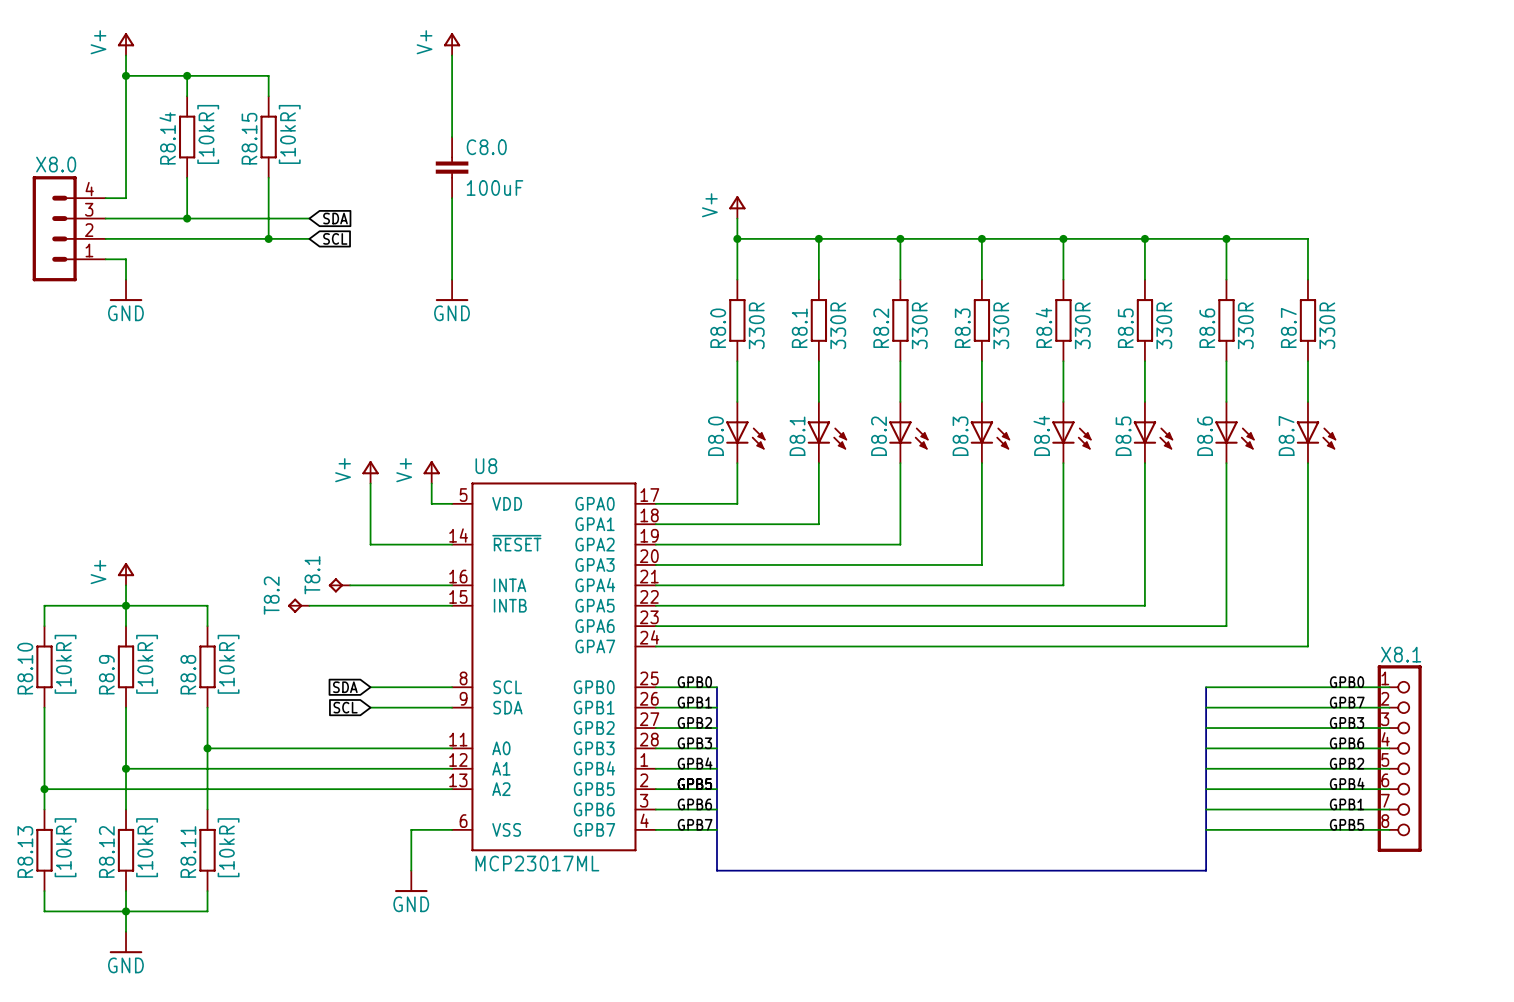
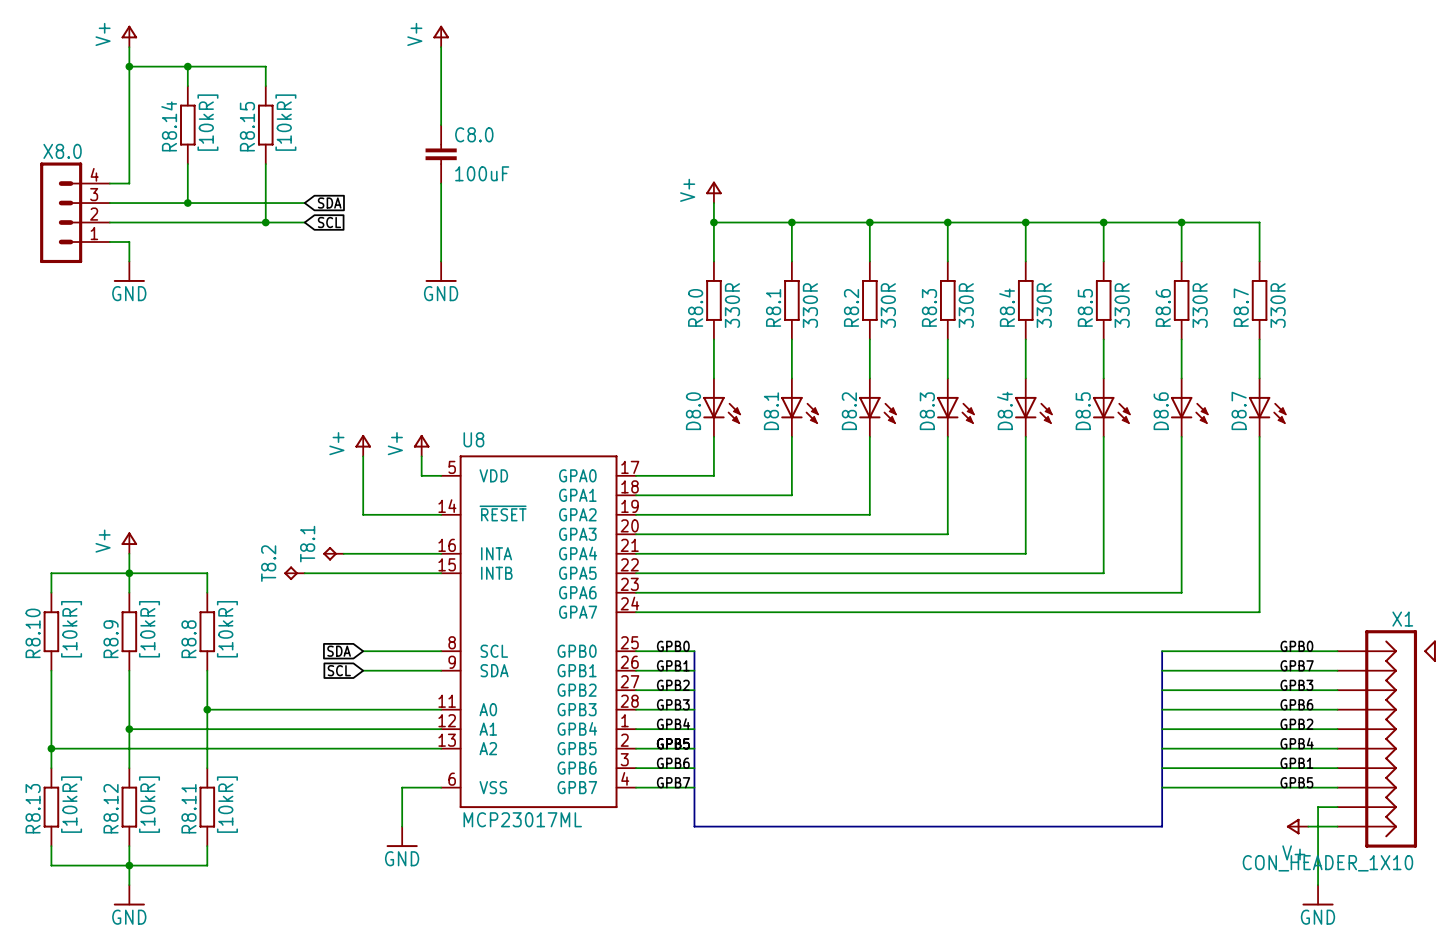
X8.1: (1399, 758) -> none
X1: none -> CON_HEADER_1X10 (1386, 738)
wire: none -> (1337, 807) (1318, 807) (1318, 885)
power symbol: none -> V+ (1297, 826)
wire: none -> (1308, 826) (1337, 826)
power symbol: none -> GND (1318, 895)

